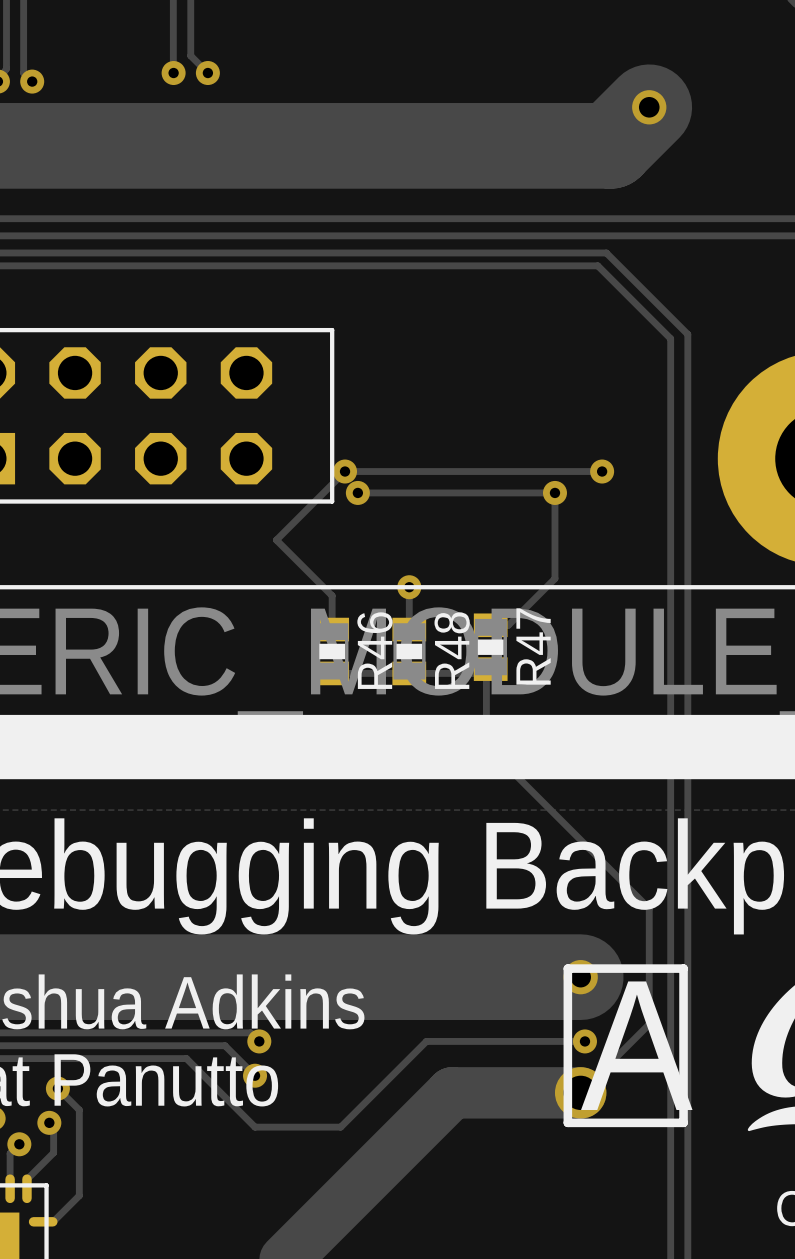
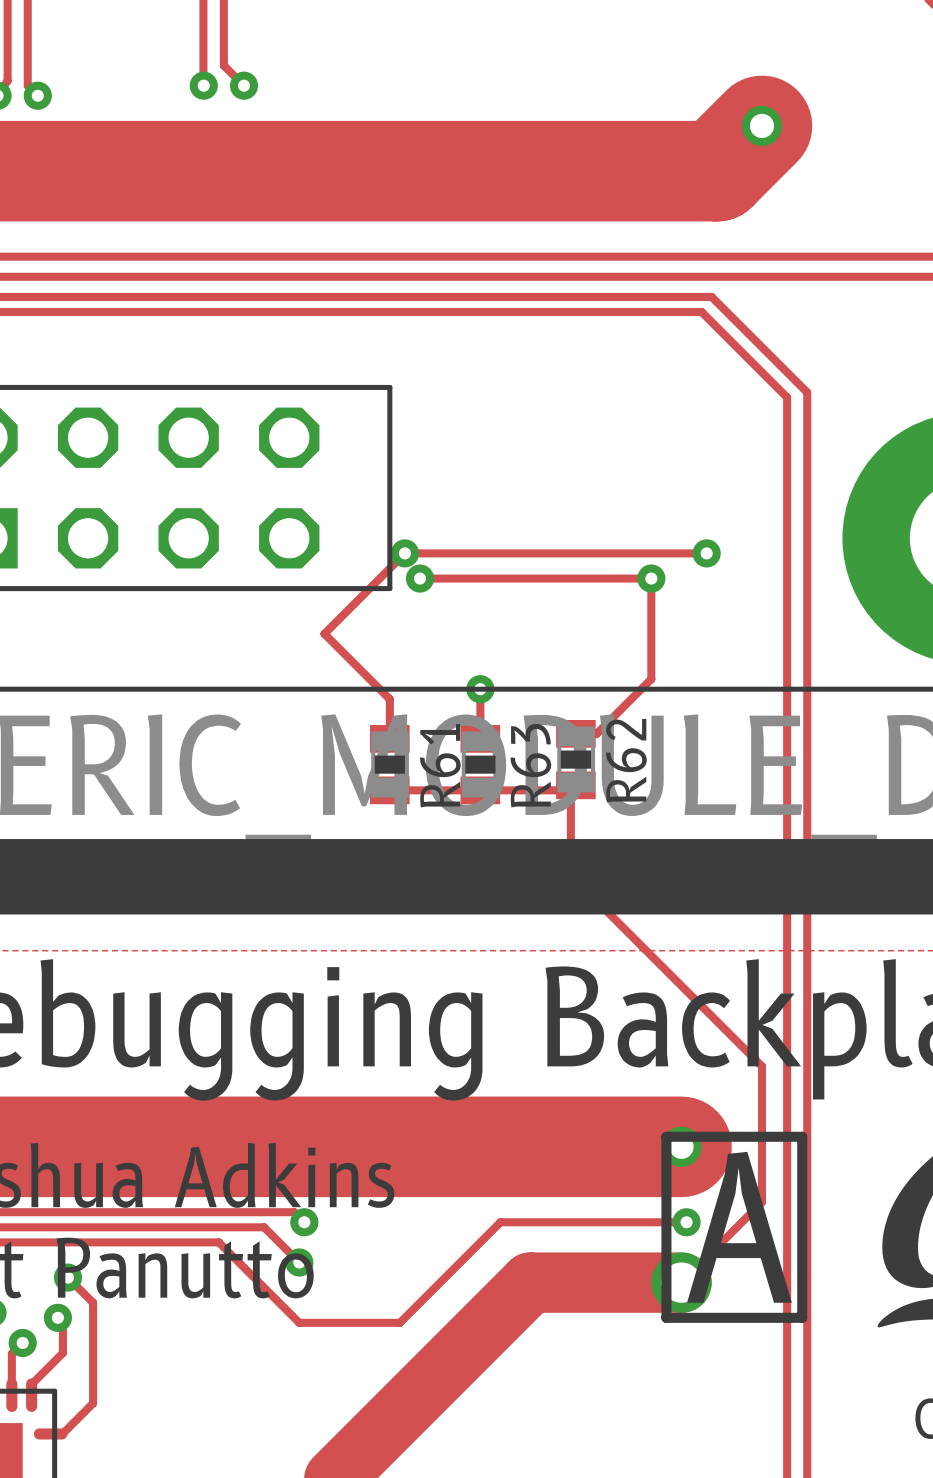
R47 name: R47 (533, 646) -> R62 (626, 760)
R46 name: R46 (375, 650) -> R61 (440, 765)
R48 name: R48 (452, 650) -> R63 (530, 765)

